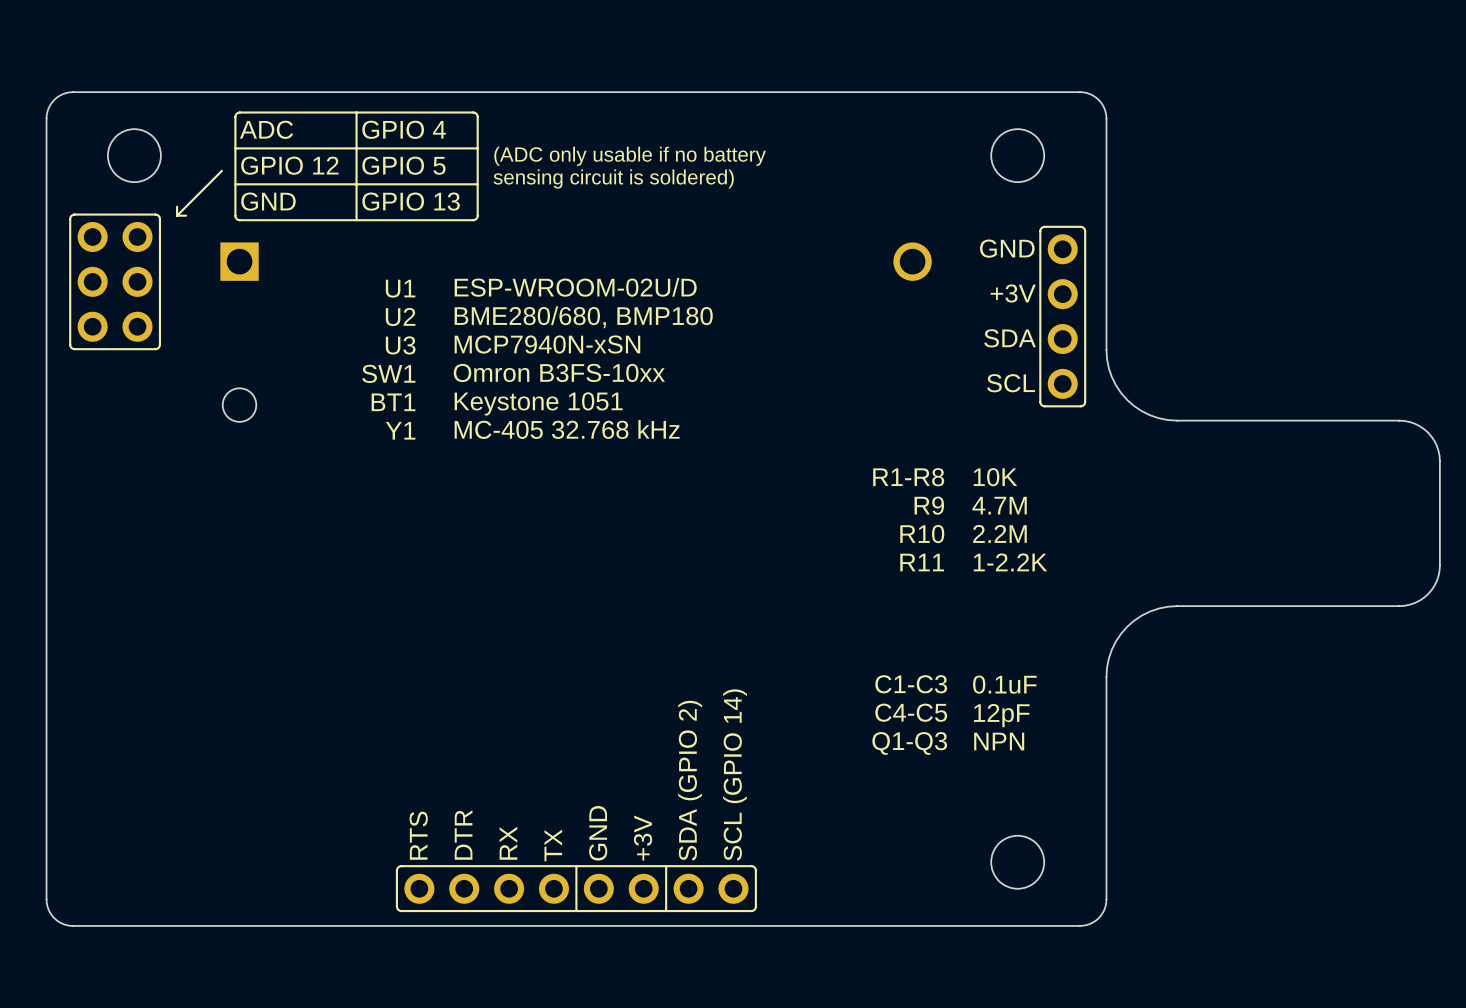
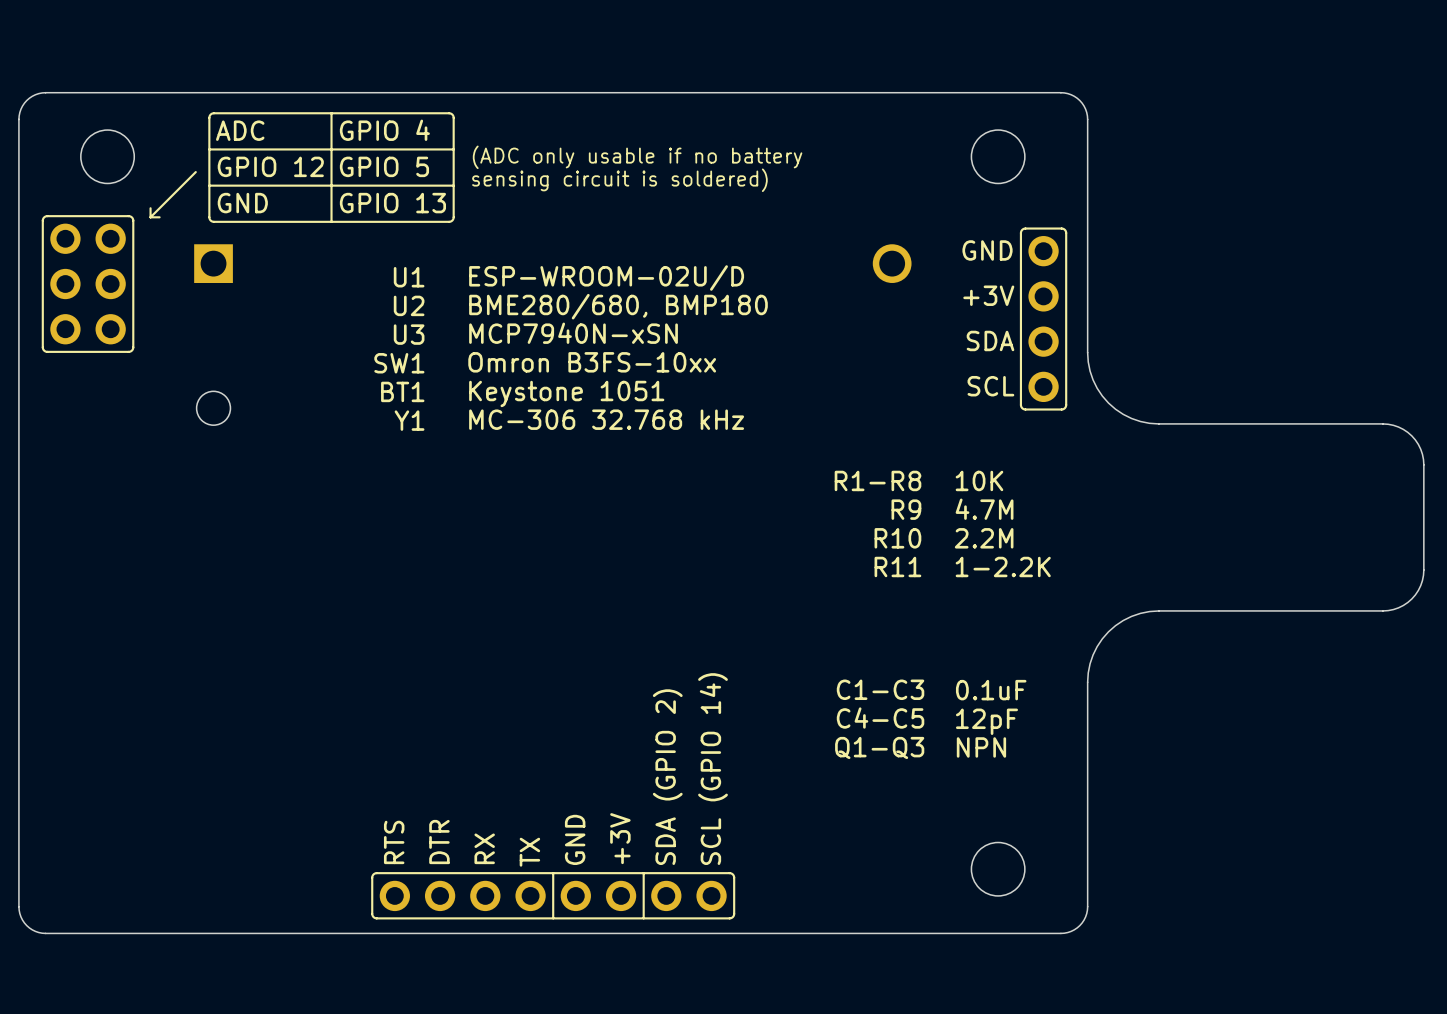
text position: ESP-WROOM-02U/D (575, 287) -> ESP-WROOM-02U/D (606, 277)
text position: U1 (400, 288) -> U1 (409, 277)
text position: U2 (400, 316) -> U2 (409, 305)
text position: BME280/680, BMP180 (583, 317) -> BME280/680, BMP180 (618, 306)
text position: MCP7940N-xSN (547, 344) -> MCP7940N-xSN (573, 333)
text position: U3 (400, 345) -> U3 (409, 334)
text position: Omron B3FS-10xx (559, 372) -> Omron B3FS-10xx (592, 362)
text position: SW1 (388, 373) -> SW1 (399, 363)
text position: BT1 (393, 402) -> BT1 (402, 391)
text position: Keystone 1051 (538, 403) -> Keystone 1051 (566, 393)
text: MC-405 32.768 kHz (567, 429) -> MC-306 32.768 kHz (606, 419)
text position: Y1 (400, 430) -> Y1 (409, 420)

